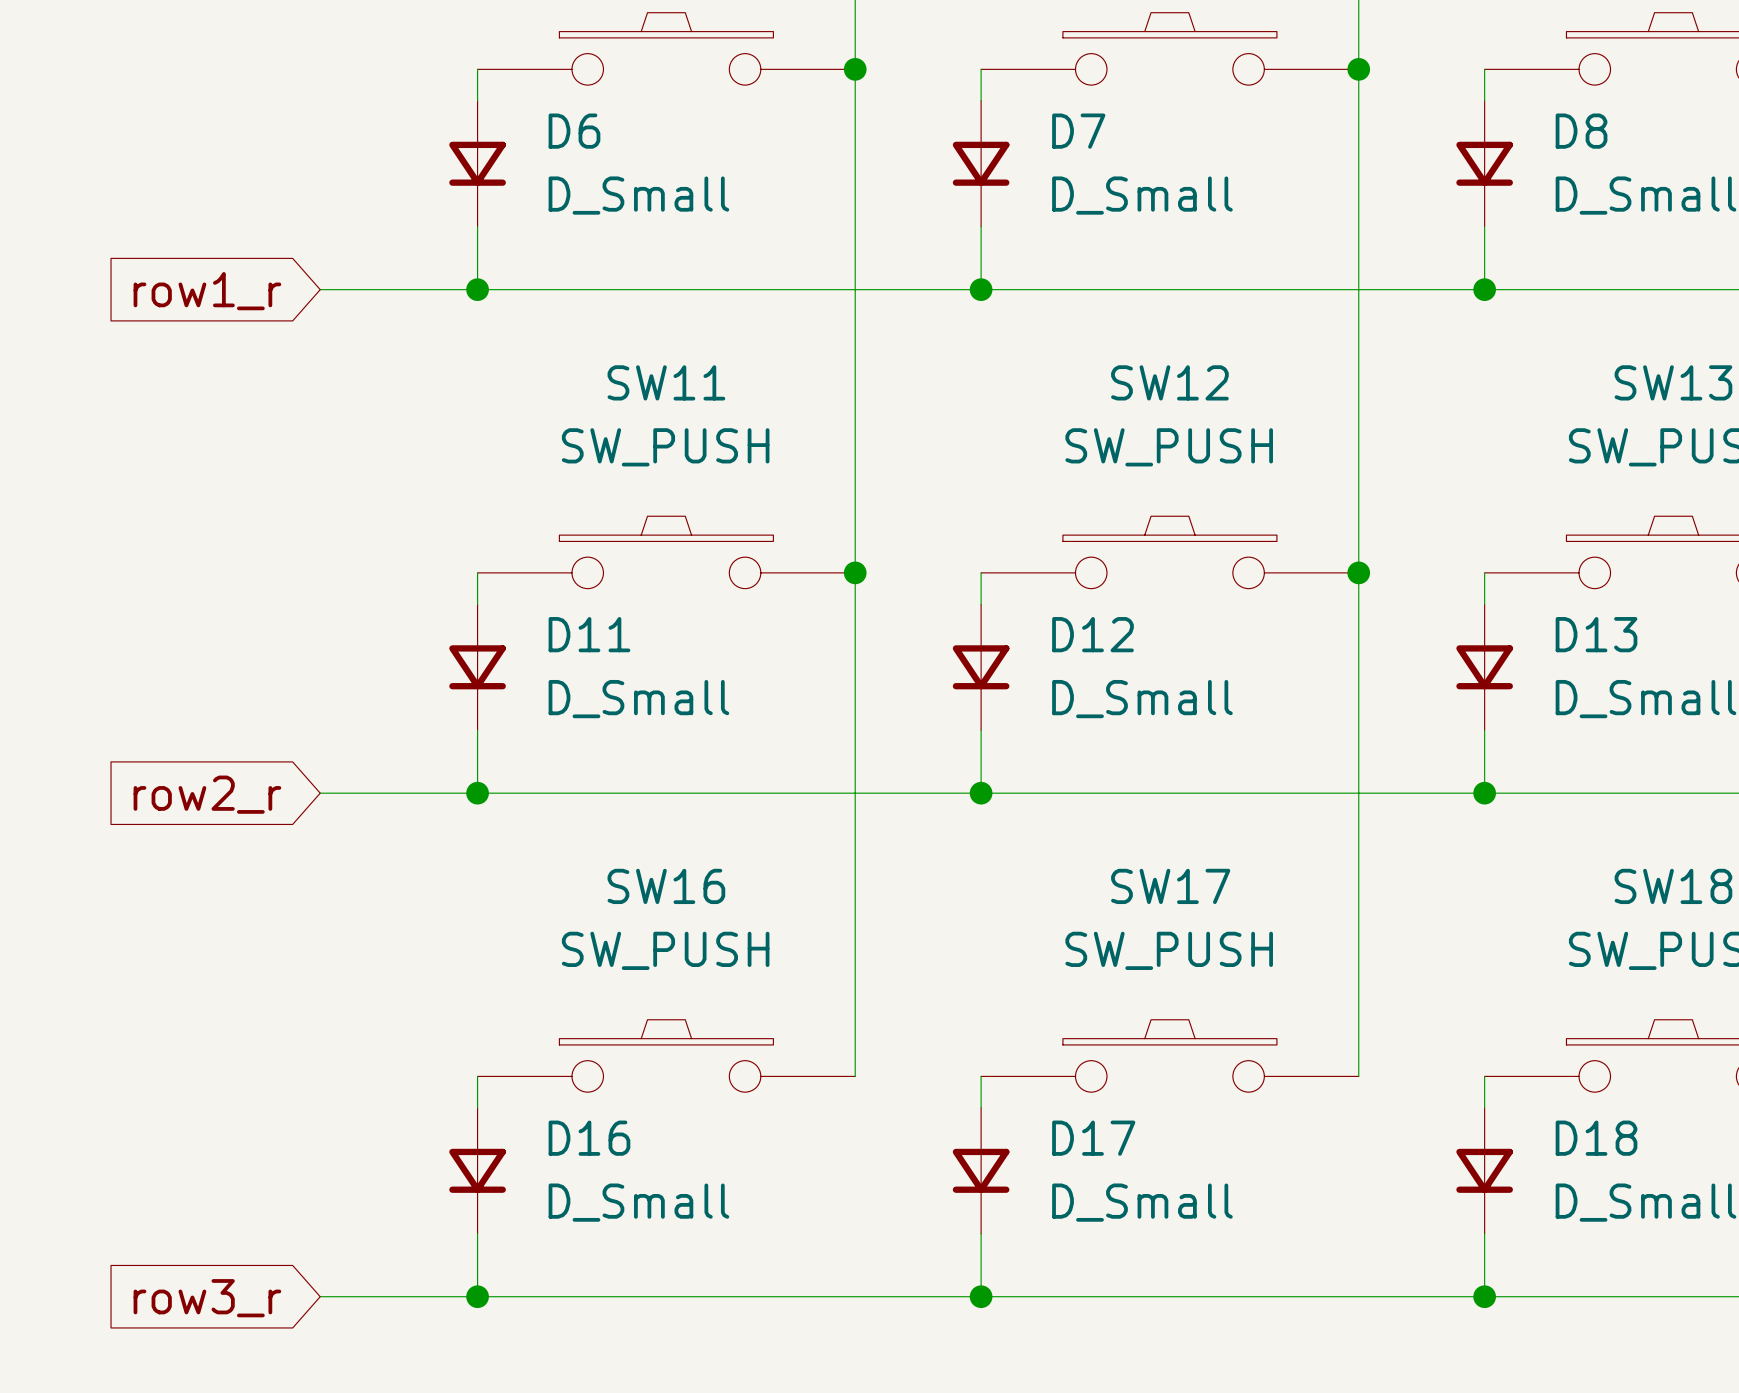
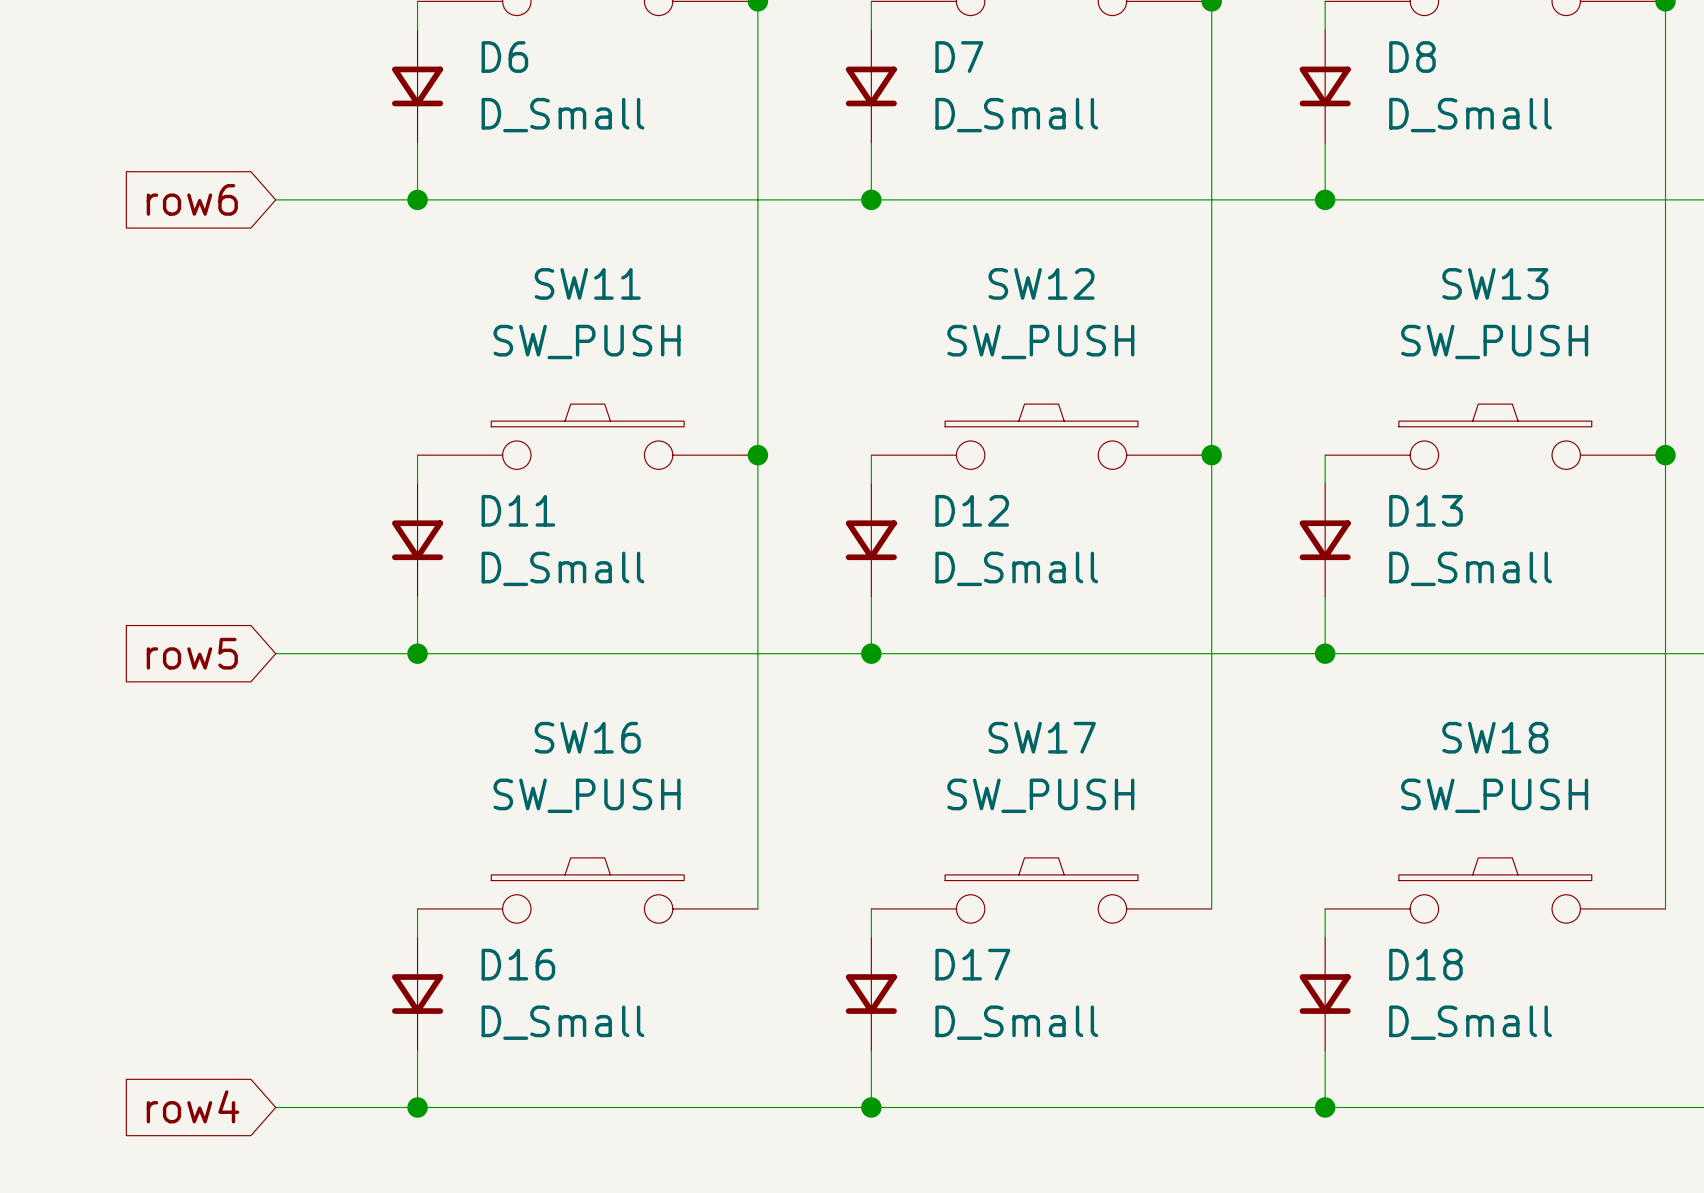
global label: row1_r (207, 291) -> row6 (192, 199)
global label: row2_r (207, 794) -> row5 (192, 653)
global label: row3_r (207, 1298) -> row4 (192, 1106)

